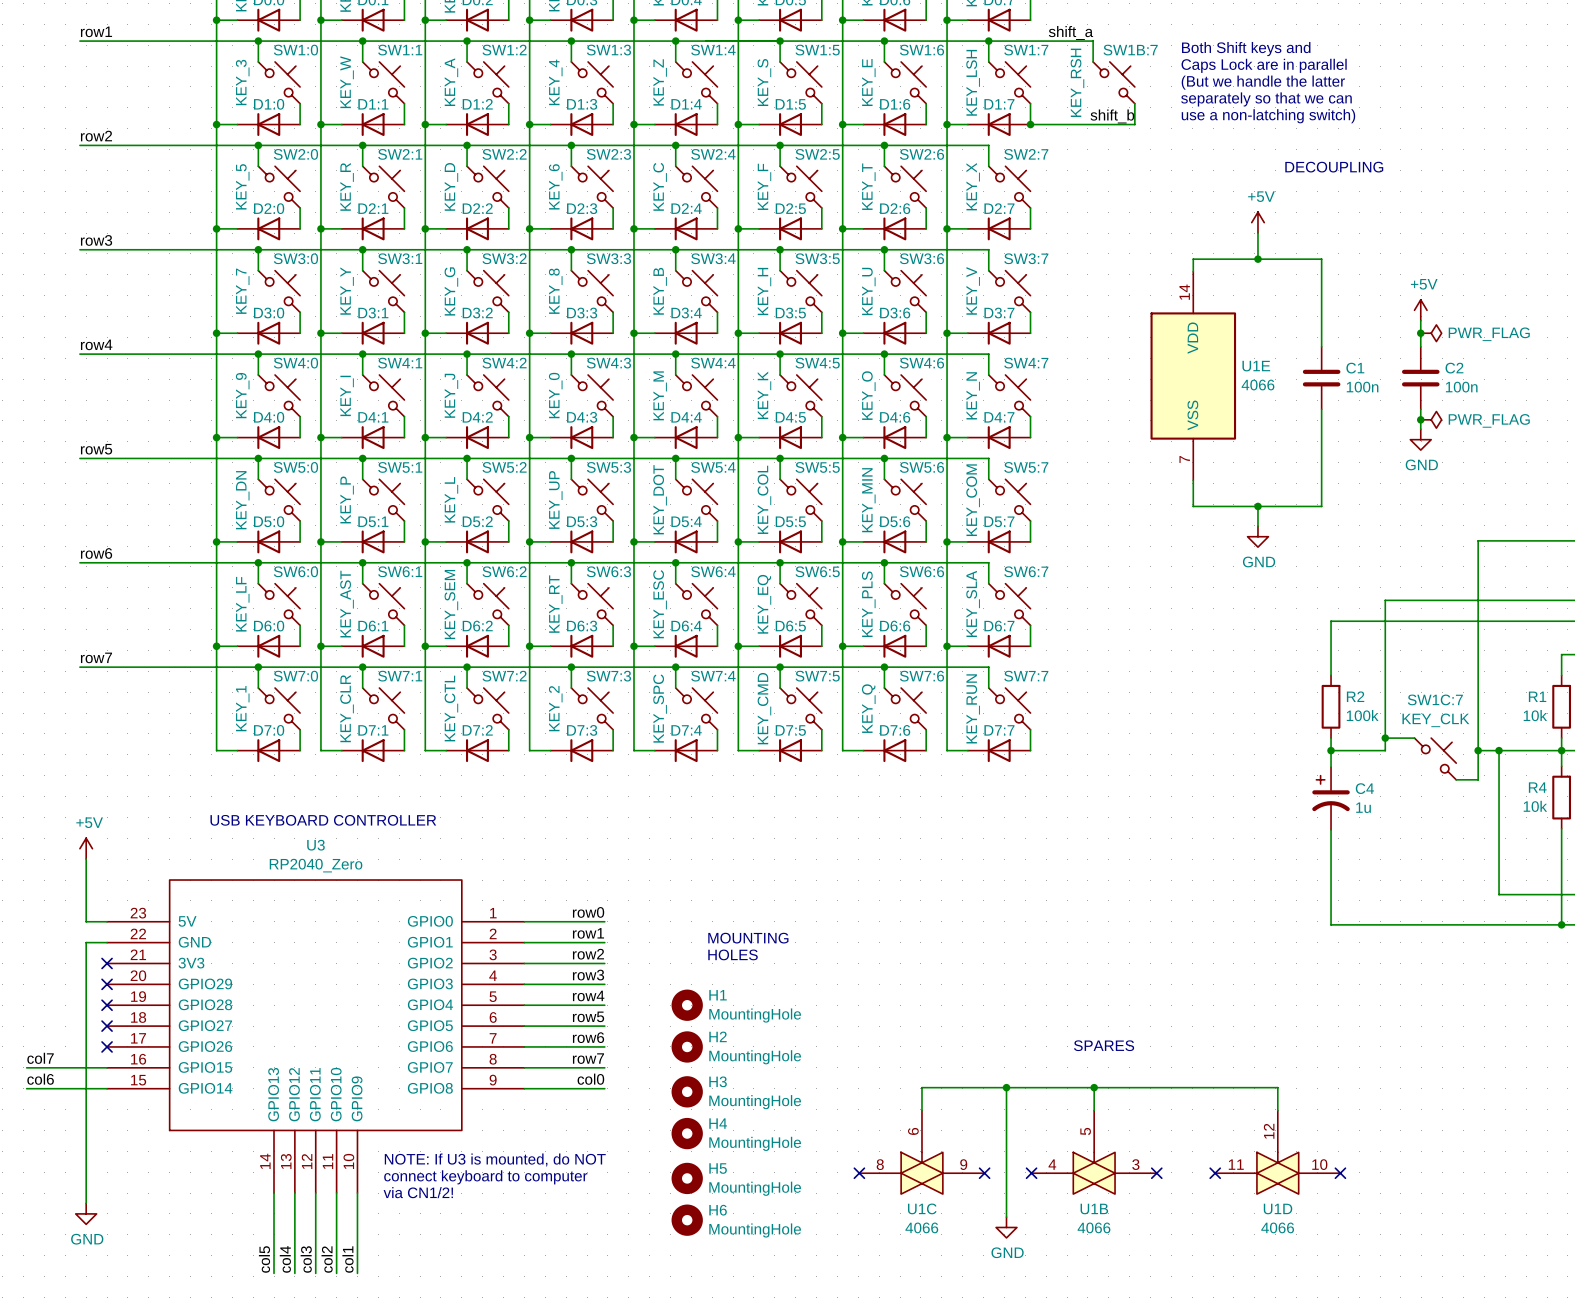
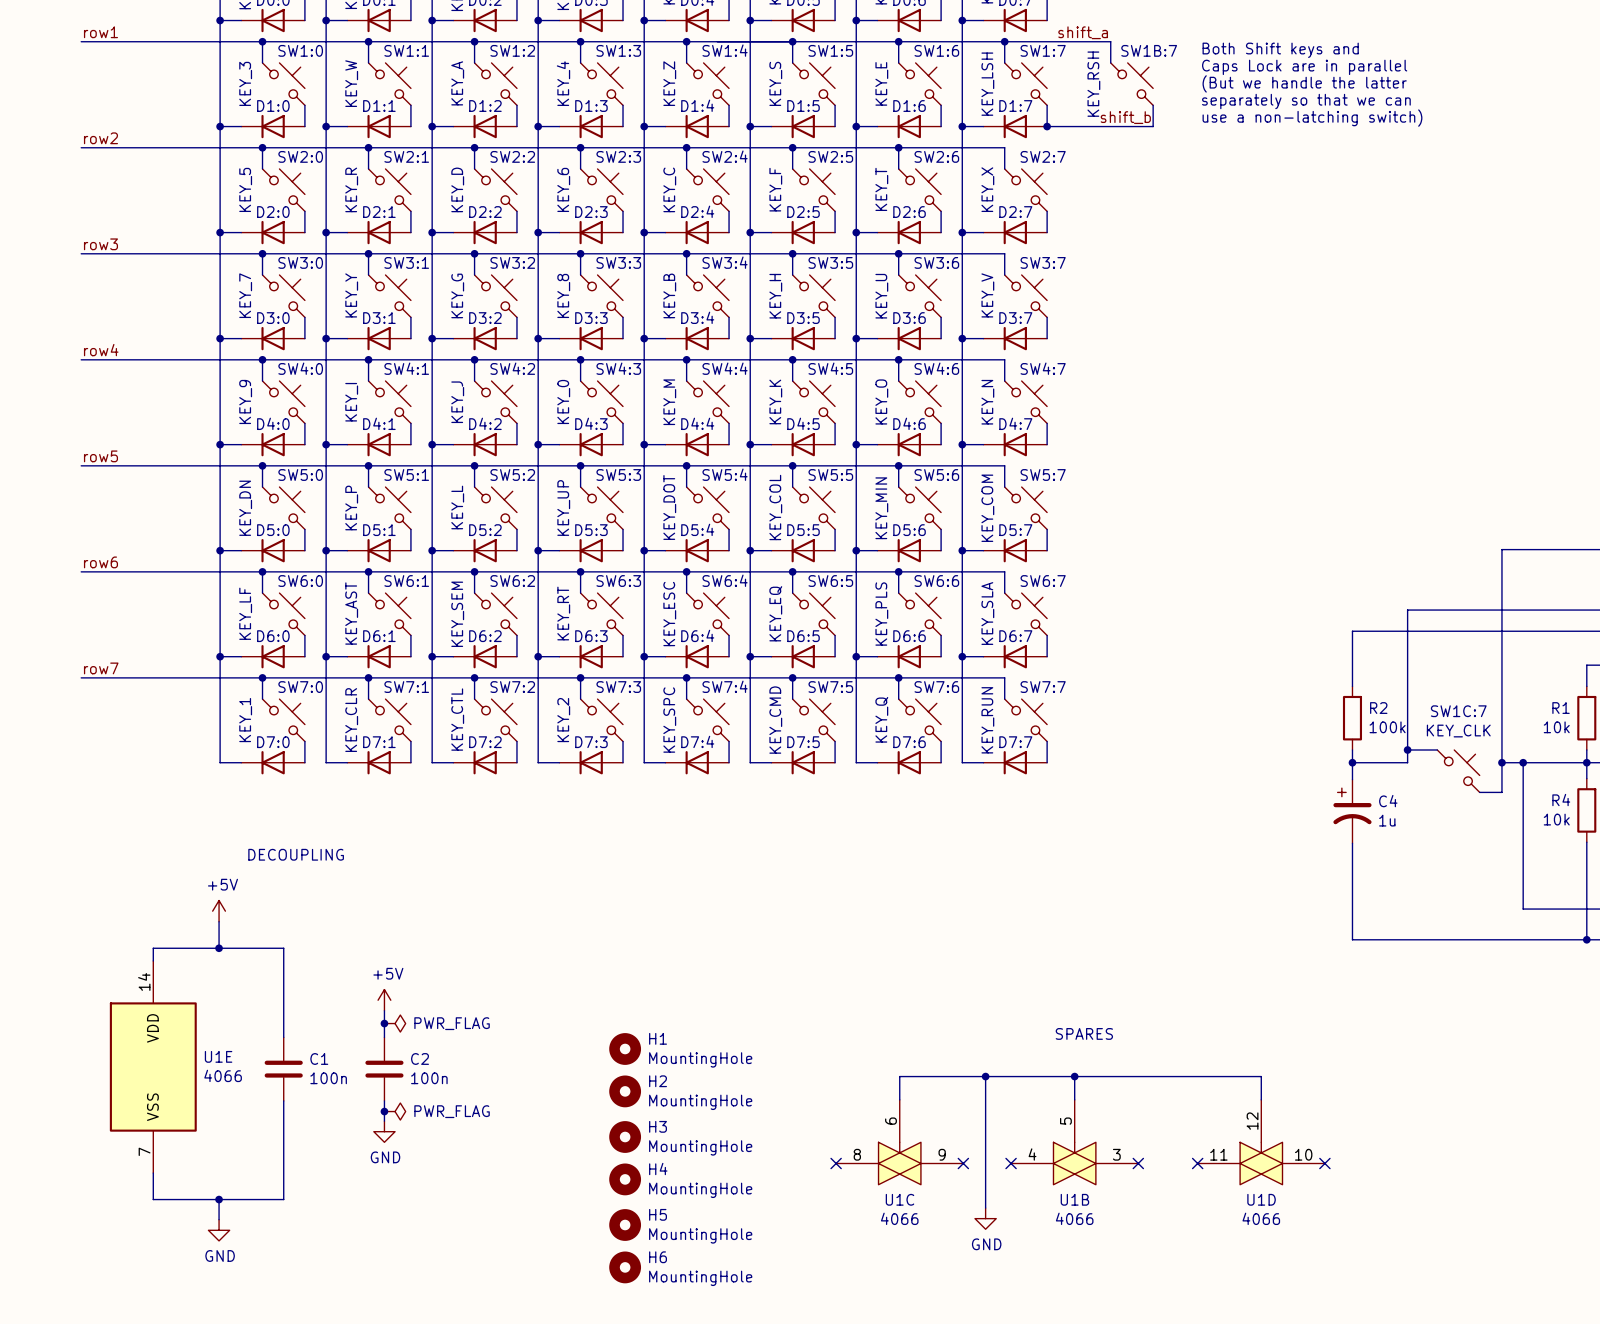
text: DECOUPLING (1334, 167) -> none
power symbol: +5V (1257, 222) -> none
wire: (1257, 233) (1257, 259) -> none
junction: (1257, 259) -> none
wire: (1193, 271) (1193, 259) (1321, 259) (1321, 346) -> none
power symbol: +5V (1420, 310) -> none
wire: (1420, 320) (1420, 346) -> none
junction: (1420, 333) -> none
power symbol: PWR_FLAG (1431, 333) -> none
U1E position: (1193, 376) -> (153, 1067)
C1 position: (1321, 378) -> (283, 1069)
C2 position: (1420, 378) -> (384, 1069)
wire: (1321, 409) (1321, 506) (1193, 506) (1193, 480) -> none
wire: (1420, 409) (1420, 429) -> none
junction: (1420, 419) -> none
power symbol: PWR_FLAG (1431, 419) -> none
power symbol: GND (1420, 439) -> none
wire: (1257, 506) (1257, 526) -> none
junction: (1257, 506) -> none
power symbol: GND (1257, 536) -> none
text: USB KEYBOARD CONTROLLER (323, 820) -> none
text: none -> DECOUPLING (296, 854)
power symbol position: +5V (86, 848) -> +5V (219, 911)
wire: (86, 859) (86, 921) (107, 921) -> none
wire: none -> (219, 921) (219, 948)
label: row0 (588, 912) -> none
wire: (524, 921) (604, 921) -> none
junction: none -> (219, 948)
label: row1 (588, 933) -> none
text: MOUNTING (748, 938) -> none
wire: (107, 942) (86, 942) (86, 1203) -> none
wire: (524, 942) (604, 942) -> none
wire: none -> (153, 960) (153, 948) (283, 948) (283, 1037)
label: row2 (588, 954) -> none
text: HOLES (733, 954) -> none
no-connect mark: (107, 963) -> none
wire: (524, 963) (604, 963) -> none
label: row3 (588, 975) -> none
no-connect mark: (107, 984) -> none
power symbol: none -> +5V (384, 1000)
wire: (524, 984) (604, 984) -> none
wire: none -> (384, 1010) (384, 1037)
label: row4 (588, 995) -> none
no-connect mark: (107, 1005) -> none
wire: (524, 1005) (604, 1005) -> none
H1 position: (687, 1005) -> (625, 1048)
junction: none -> (384, 1023)
power symbol: none -> PWR_FLAG (395, 1023)
label: row5 (588, 1016) -> none
no-connect mark: (107, 1026) -> none
wire: (524, 1026) (604, 1026) -> none
U3: RP2040_Zero (315, 1036) -> none
label: row6 (588, 1037) -> none
text position: SPARES (1104, 1045) -> SPARES (1084, 1033)
no-connect mark: (107, 1046) -> none
wire: (524, 1046) (604, 1046) -> none
H2 position: (687, 1046) -> (625, 1091)
label: col7 (40, 1058) -> none
label: row7 (588, 1058) -> none
junction: none -> (985, 1076)
junction: none -> (1074, 1076)
wire: (26, 1067) (107, 1067) -> none
wire: (524, 1067) (604, 1067) -> none
label: col6 (40, 1079) -> none
label: col0 (590, 1079) -> none
wire: none -> (283, 1100) (283, 1199) (153, 1199) (153, 1173)
wire: none -> (384, 1100) (384, 1121)
wire: (1006, 1087) (1006, 1217) -> (985, 1076) (985, 1208)
junction: (1006, 1087) -> none
wire: (1094, 1087) (1094, 1110) -> (1074, 1076) (1074, 1099)
junction: (1094, 1087) -> none
wire: (26, 1088) (107, 1088) -> none
wire: (524, 1088) (604, 1088) -> none
H3 position: (687, 1091) -> (625, 1137)
junction: none -> (384, 1111)
power symbol: none -> PWR_FLAG (395, 1111)
wire: (921, 1110) (921, 1087) (1277, 1087) (1277, 1110) -> (899, 1099) (899, 1076) (1261, 1076) (1261, 1099)
power symbol: none -> GND (384, 1131)
H4 position: (687, 1133) -> (625, 1179)
no-connect mark: none -> (963, 1163)
no-connect mark: none -> (1011, 1163)
no-connect mark: none -> (1138, 1163)
no-connect mark: none -> (1197, 1163)
U1C position: (921, 1152) -> (899, 1142)
U1B position: (1094, 1152) -> (1074, 1142)
U1D position: (1277, 1152) -> (1261, 1142)
text: NOTE: If U3 is mounted, do NOT (495, 1159) -> none
no-connect mark position: (859, 1173) -> (836, 1163)
no-connect mark: (984, 1173) -> none
no-connect mark: (1031, 1173) -> none
no-connect mark: (1156, 1173) -> none
no-connect mark: (1215, 1173) -> none
no-connect mark position: (1340, 1173) -> (1324, 1163)
text: connect keyboard to computer (485, 1177) -> none
H5 position: (687, 1178) -> (625, 1225)
wire: none -> (219, 1199) (219, 1219)
junction: none -> (219, 1199)
text: via CN1/2! (418, 1192) -> none
wire: (274, 1193) (274, 1273) -> none
wire: (294, 1193) (294, 1273) -> none
wire: (315, 1193) (315, 1273) -> none
wire: (336, 1193) (336, 1273) -> none
wire: (357, 1193) (357, 1273) -> none
power symbol position: GND (86, 1213) -> GND (219, 1230)
H6 position: (687, 1220) -> (625, 1267)
power symbol position: GND (1006, 1227) -> GND (985, 1218)
label: col5 (264, 1259) -> none
label: col4 (285, 1259) -> none
label: col3 (306, 1259) -> none
label: col2 (327, 1259) -> none
label: col1 (347, 1259) -> none

